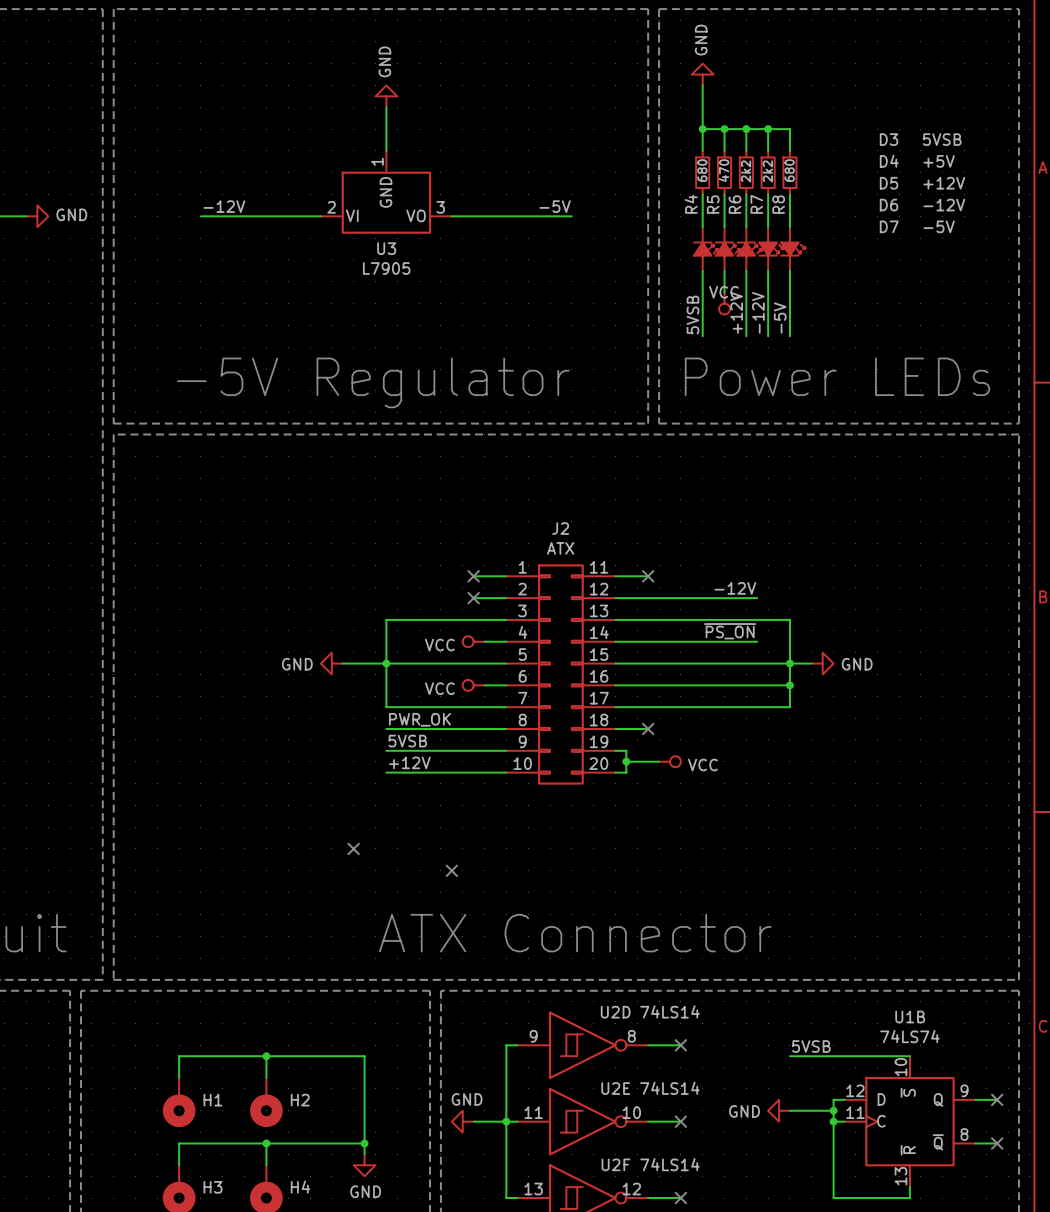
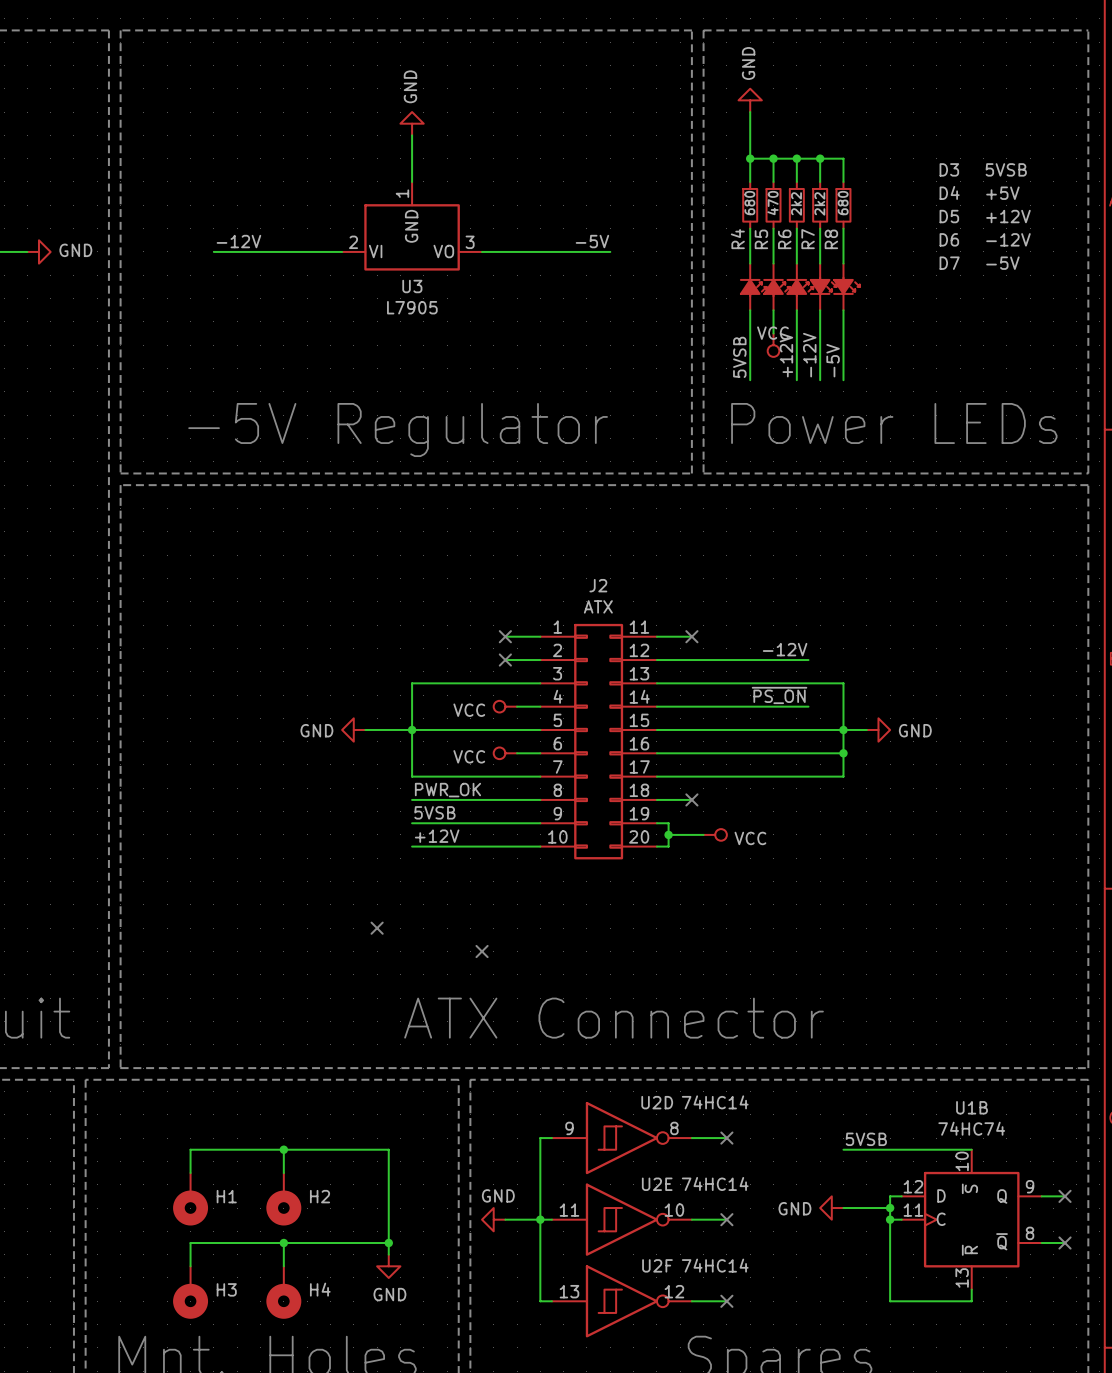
U2D value: 74LS14 (669, 1011) -> 74HC14 (715, 1102)
U1B value: 74LS74 (909, 1036) -> 74HC74 (971, 1128)
U2E value: 74LS14 (669, 1088) -> 74HC14 (715, 1183)
U2F value: 74LS14 (669, 1164) -> 74HC14 (715, 1265)

